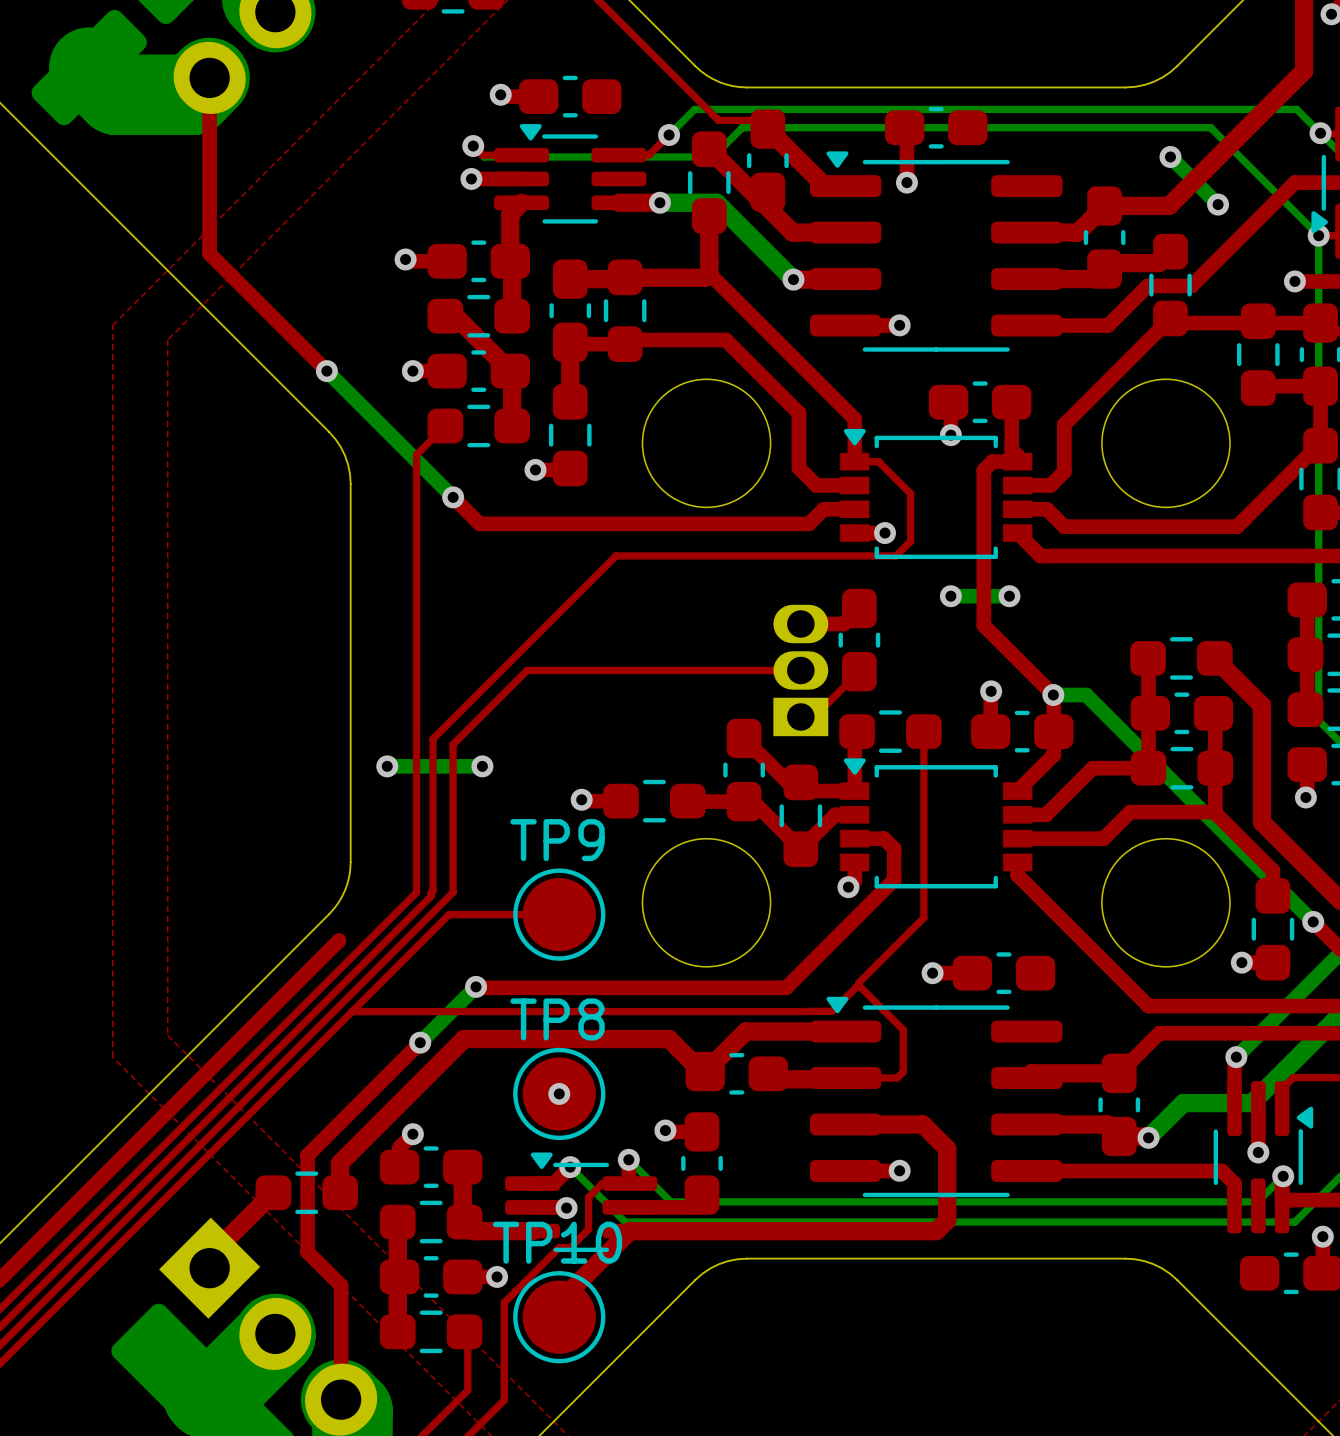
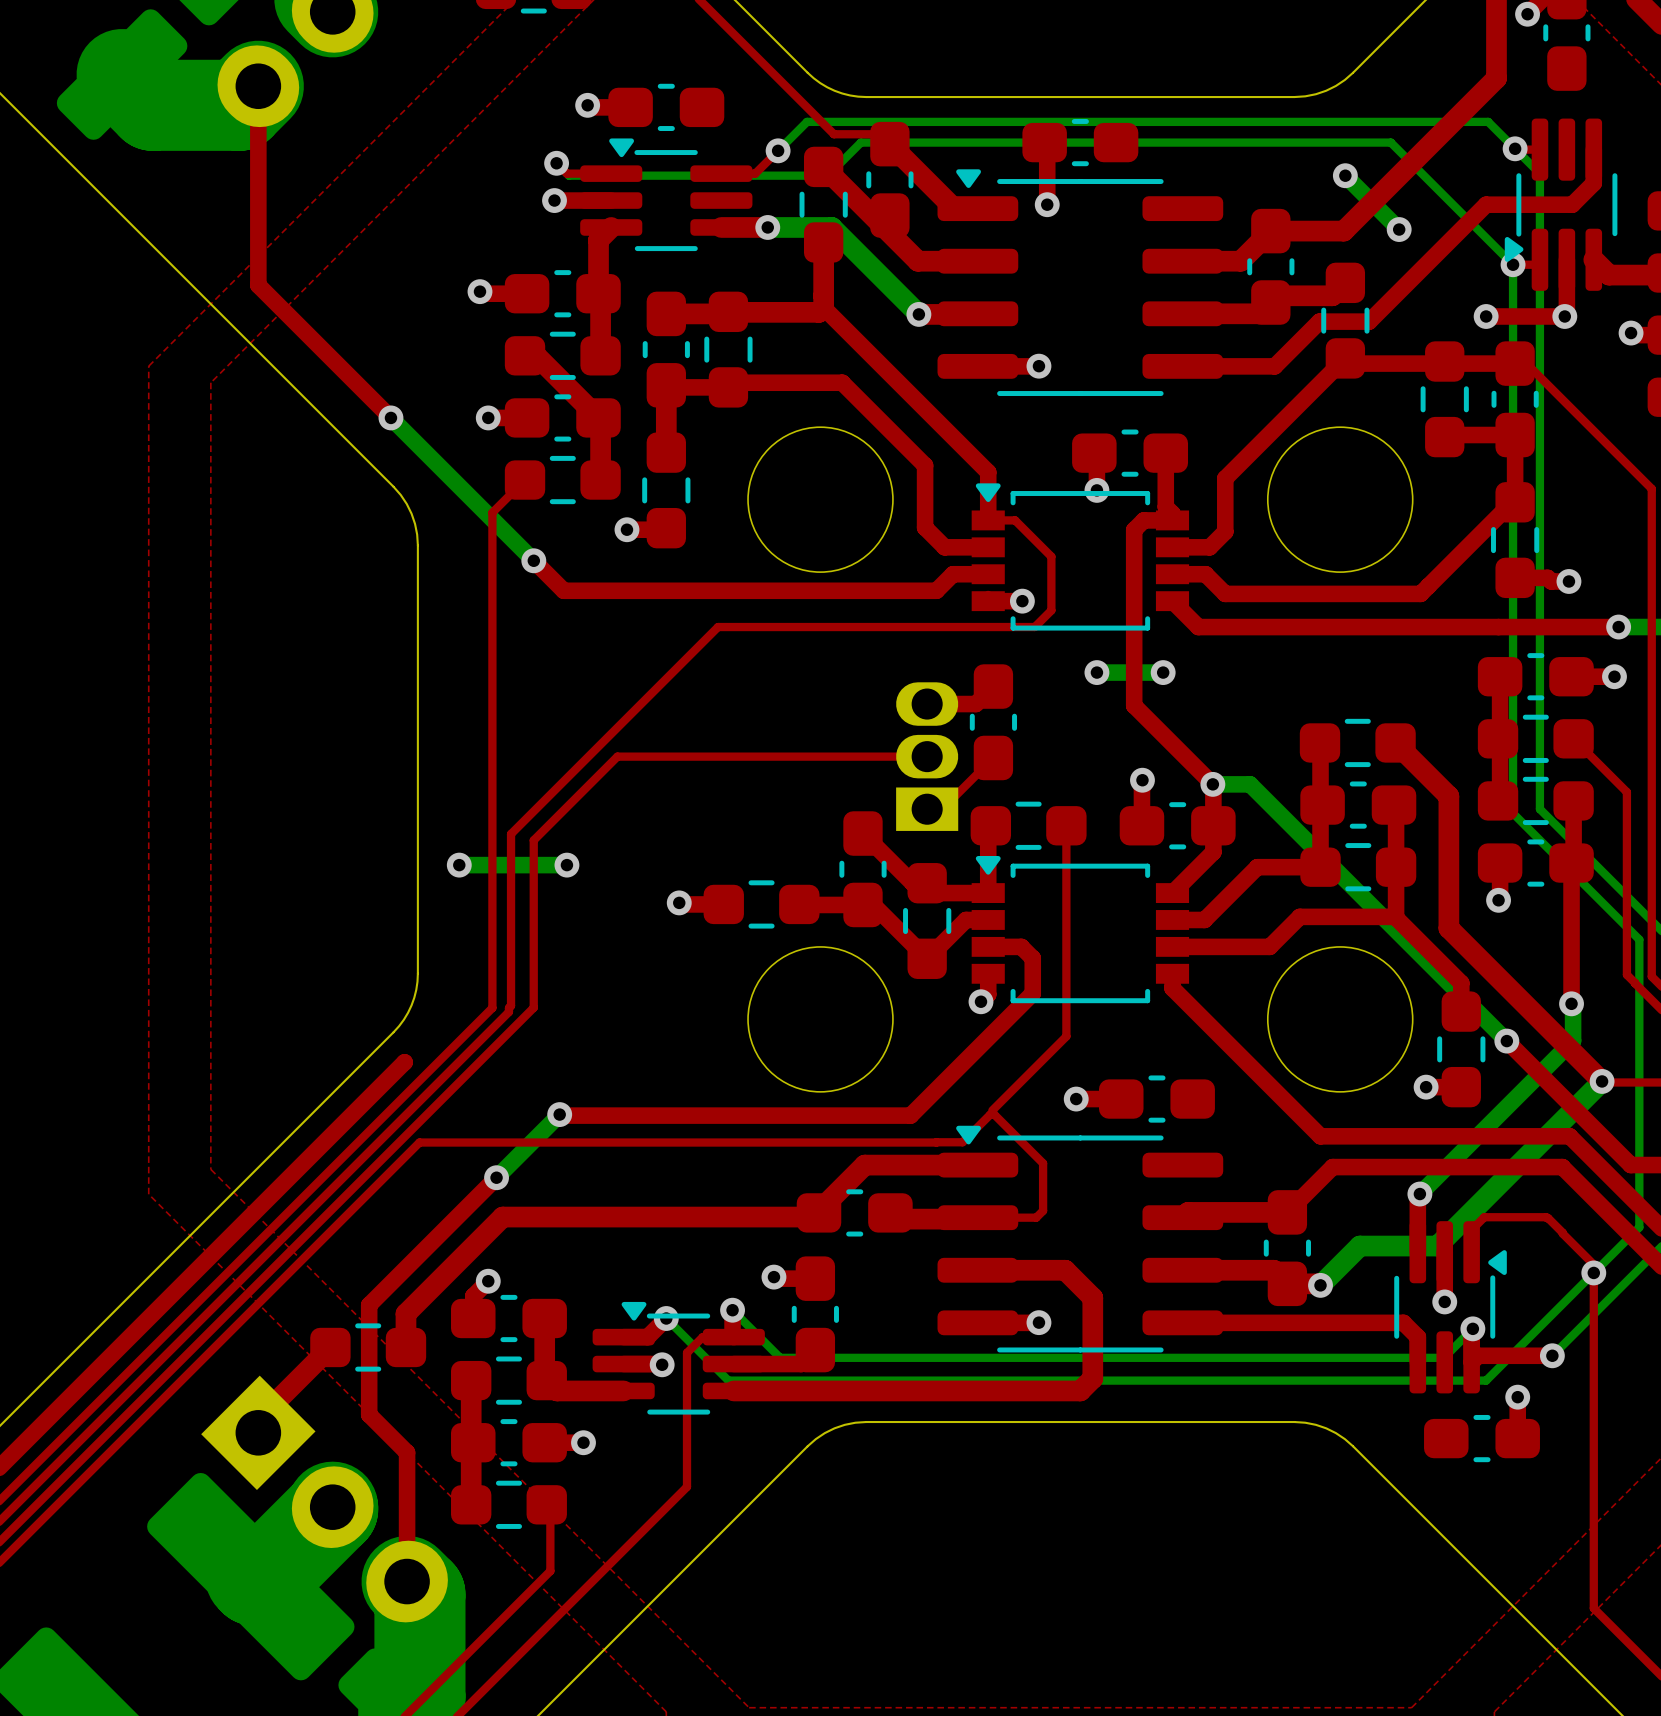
top track: (559, 914) (449, 914) (352, 1011) -> none
TP9: (559, 914) -> none
top track: (716, 1061) (691, 1061) (669, 1039) (464, 1039) (425, 1077) -> (831, 1198) (812, 1217) (502, 1217)
TP8: (559, 1093) -> none
via: (559, 1093) -> none
top track: (588, 1229) (570, 1247) (559, 1247) (504, 1302) (504, 1400) -> (687, 1388) (687, 1486) (591, 1582)
top track: (629, 1231) (570, 1290) (570, 1306) -> none
TP10: (559, 1317) -> none

